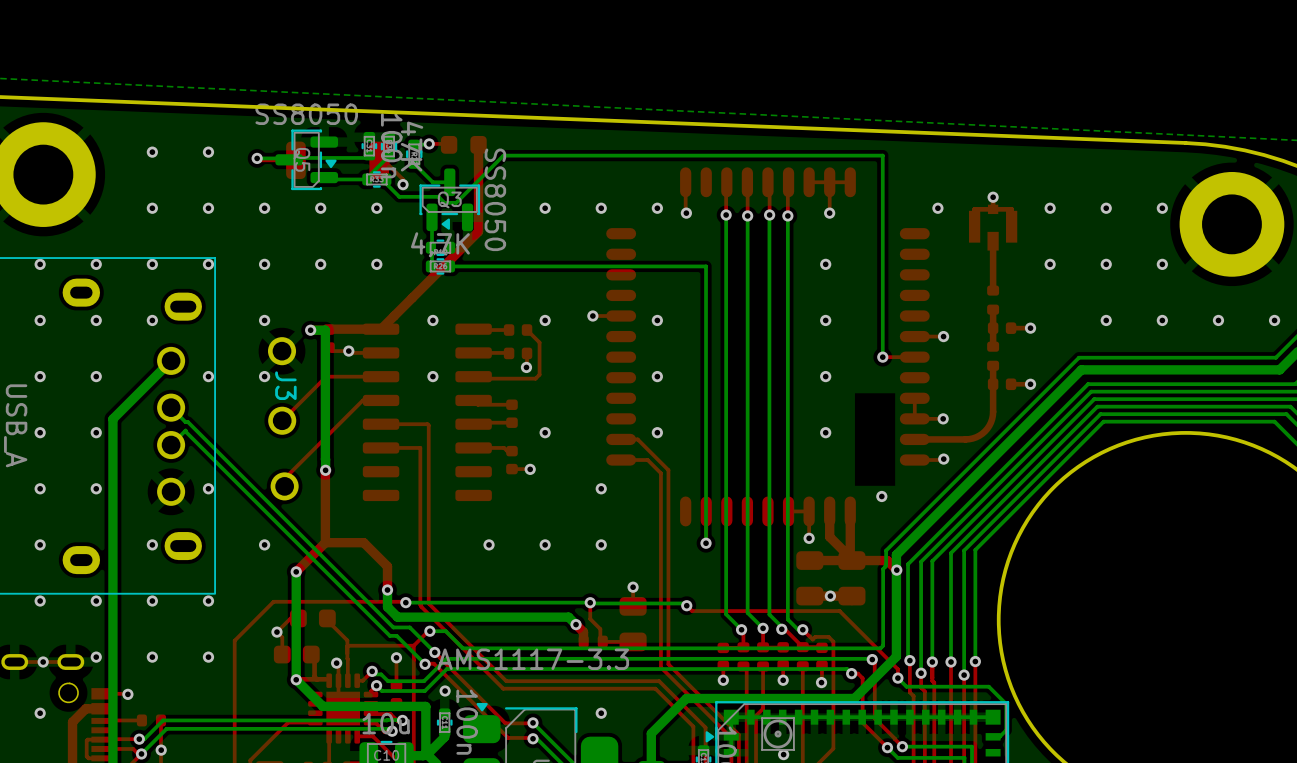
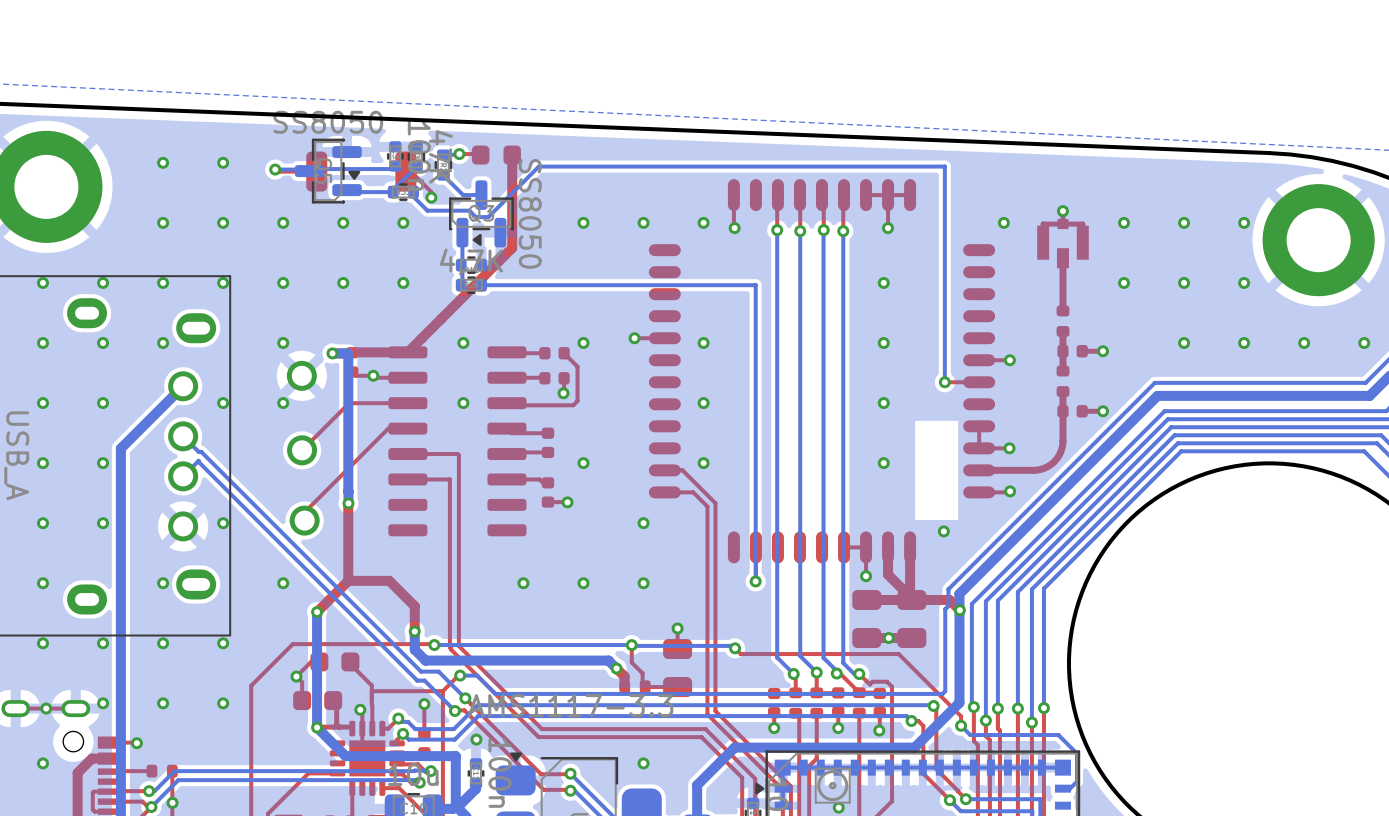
J3 name: J3 (285, 385) -> none

